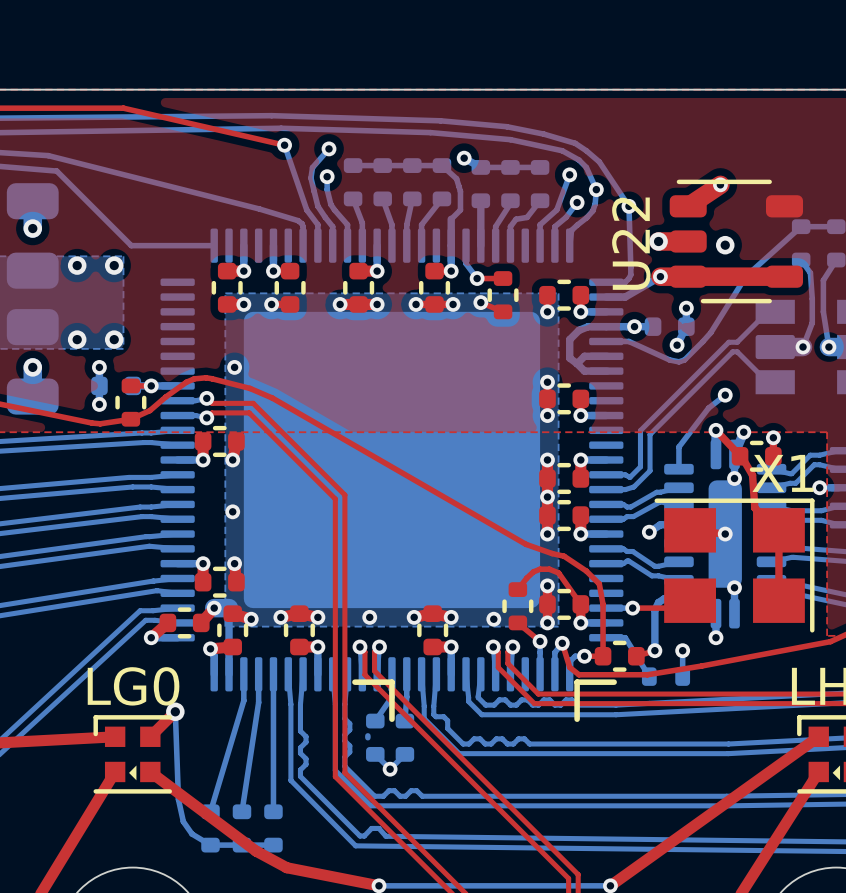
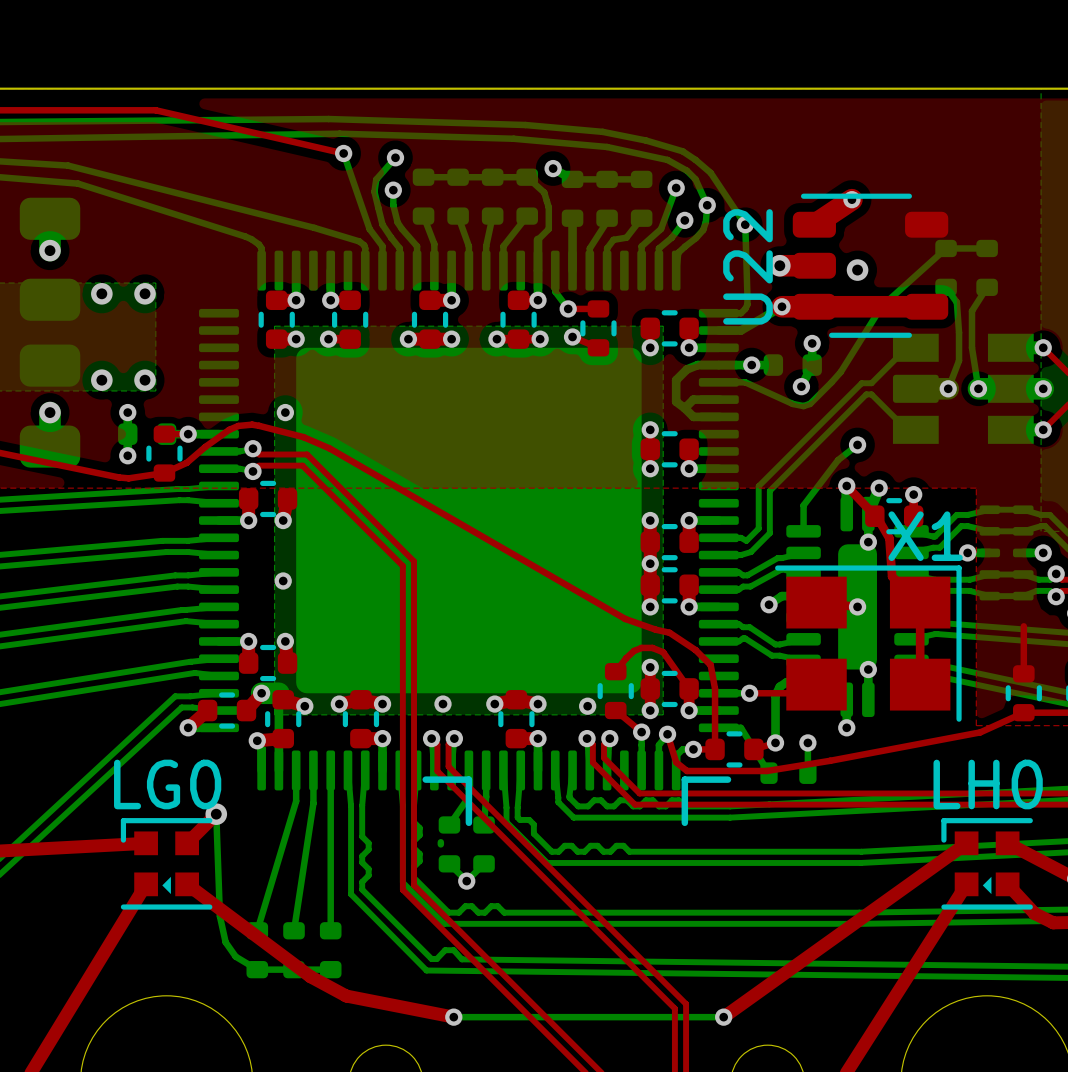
bottom track: (56, 171) (131, 245) (214, 245) -> (78, 183) (251, 239) (261, 248) (261, 270)

